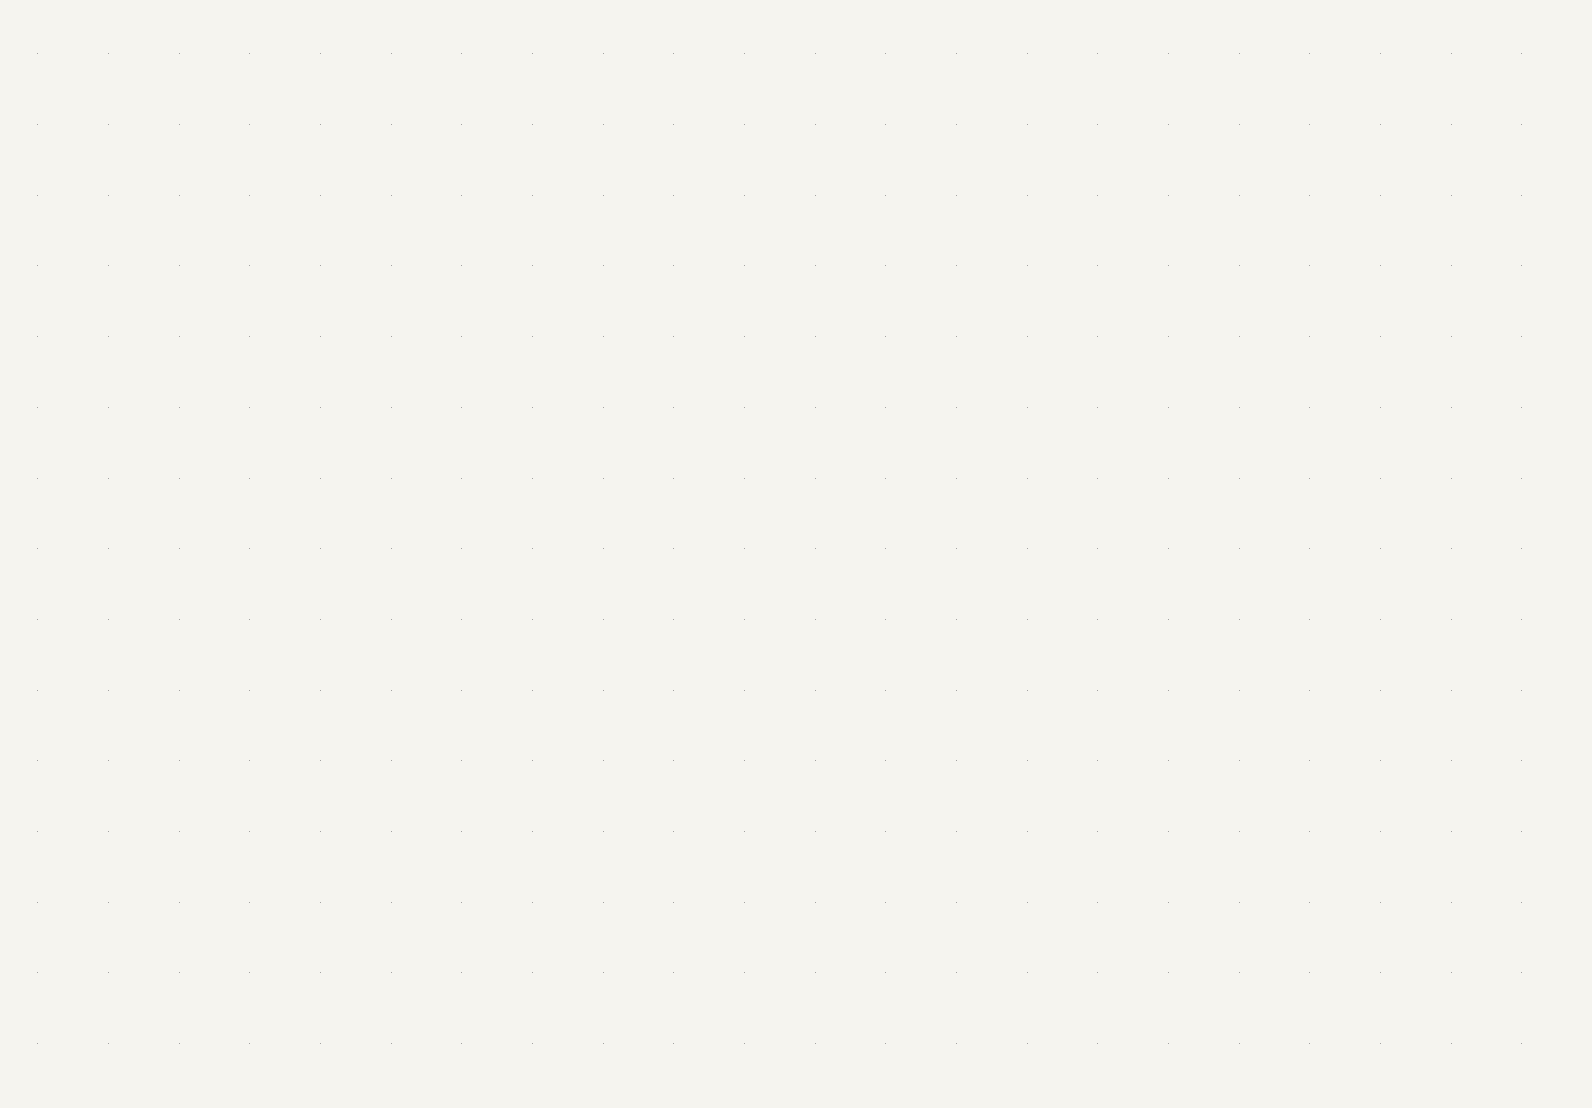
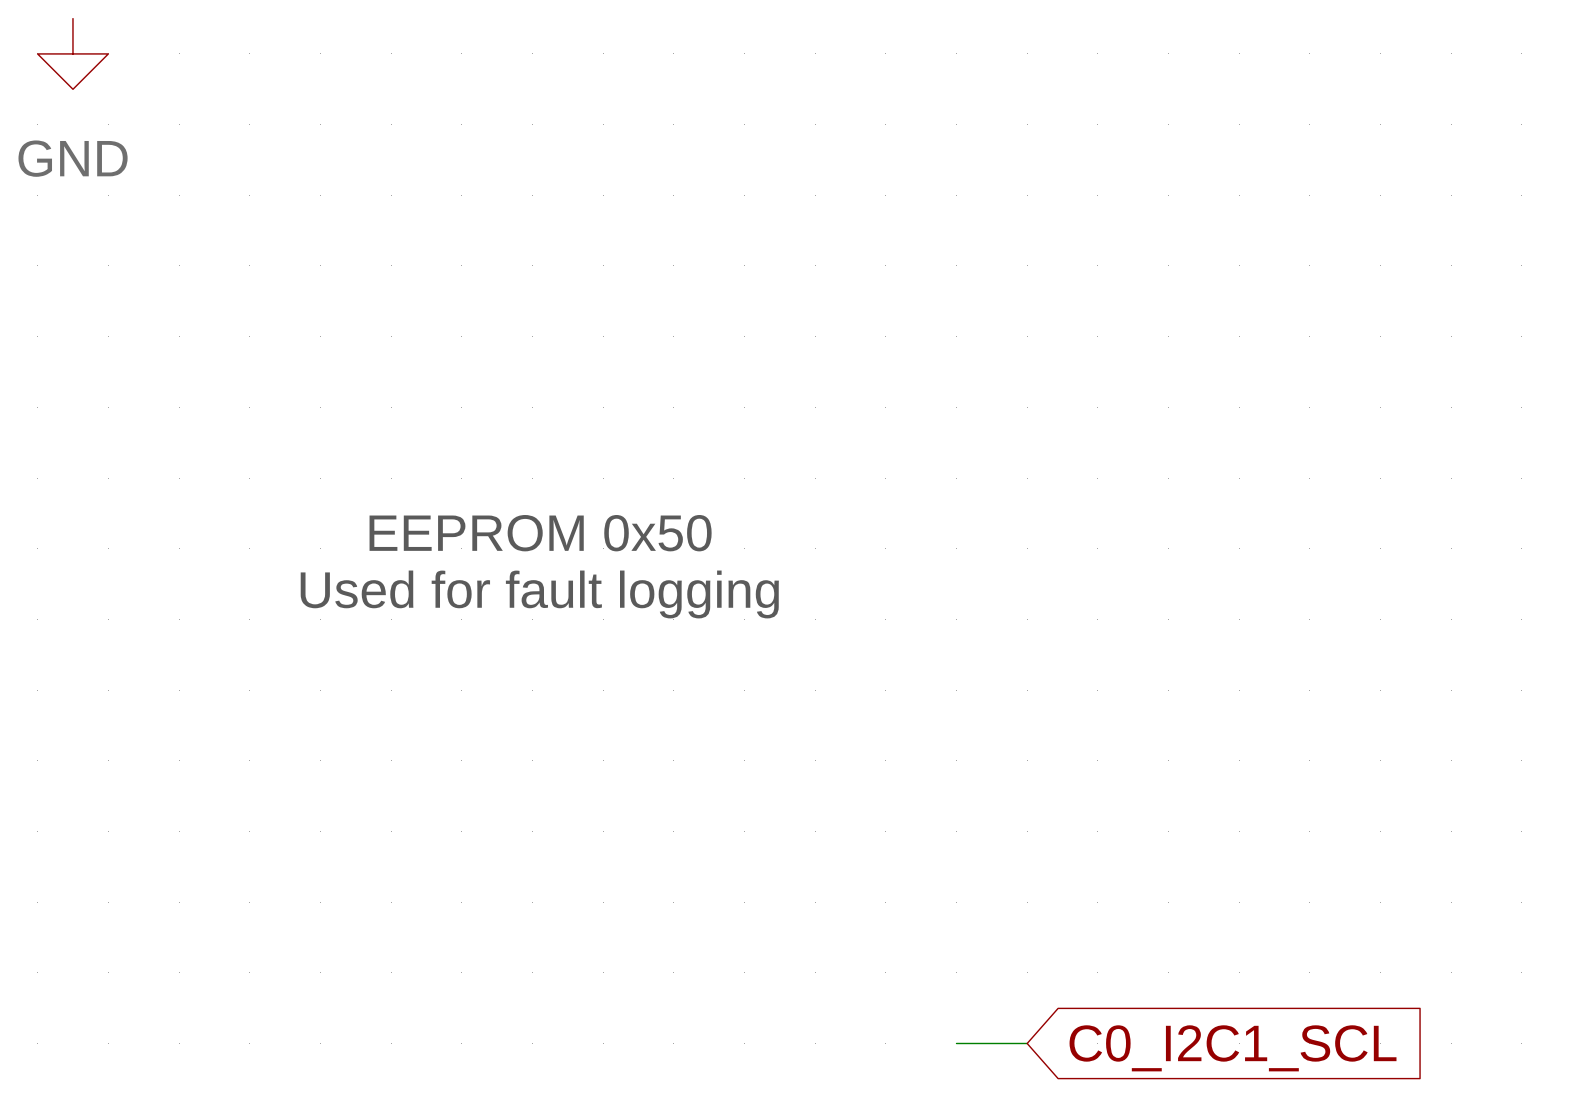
power symbol: none -> GND (72, 53)
text: none -> EEPROM 0x50 (540, 533)
text: none -> Used for fault logging (539, 594)
wire: none -> (956, 1043) (1027, 1043)
global label: none -> C0_I2C1_SCL (1233, 1048)

